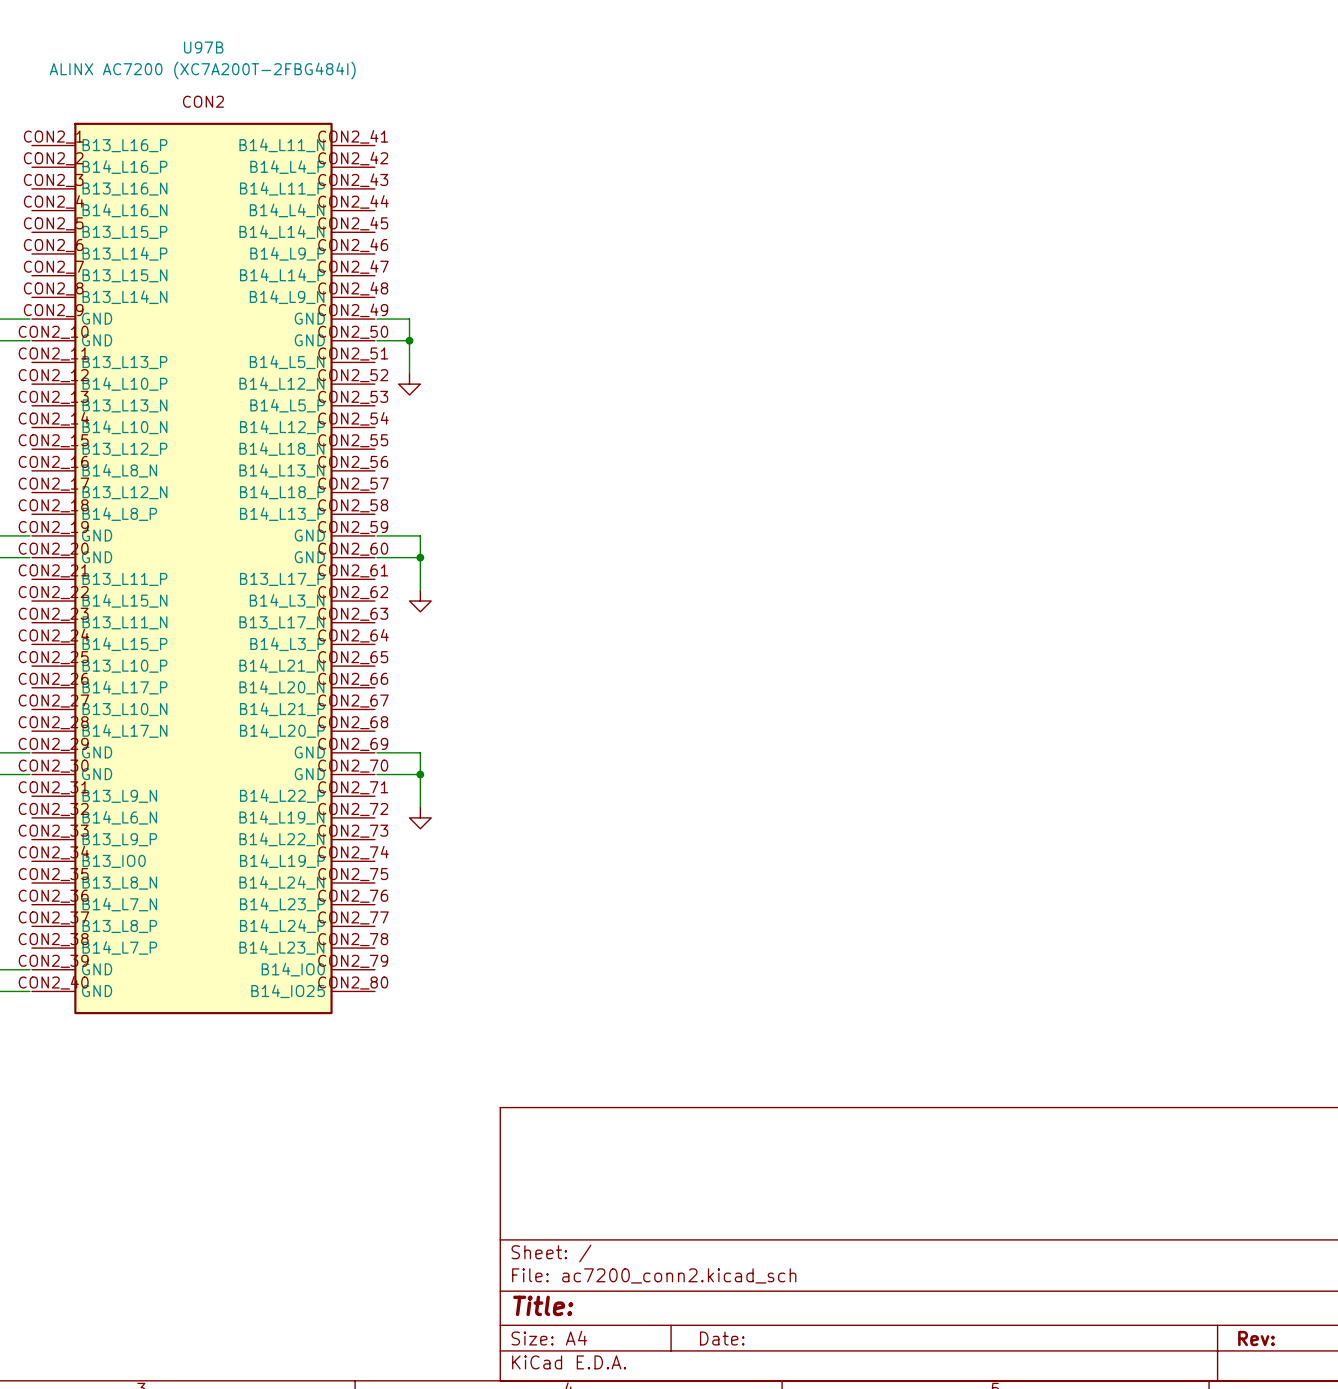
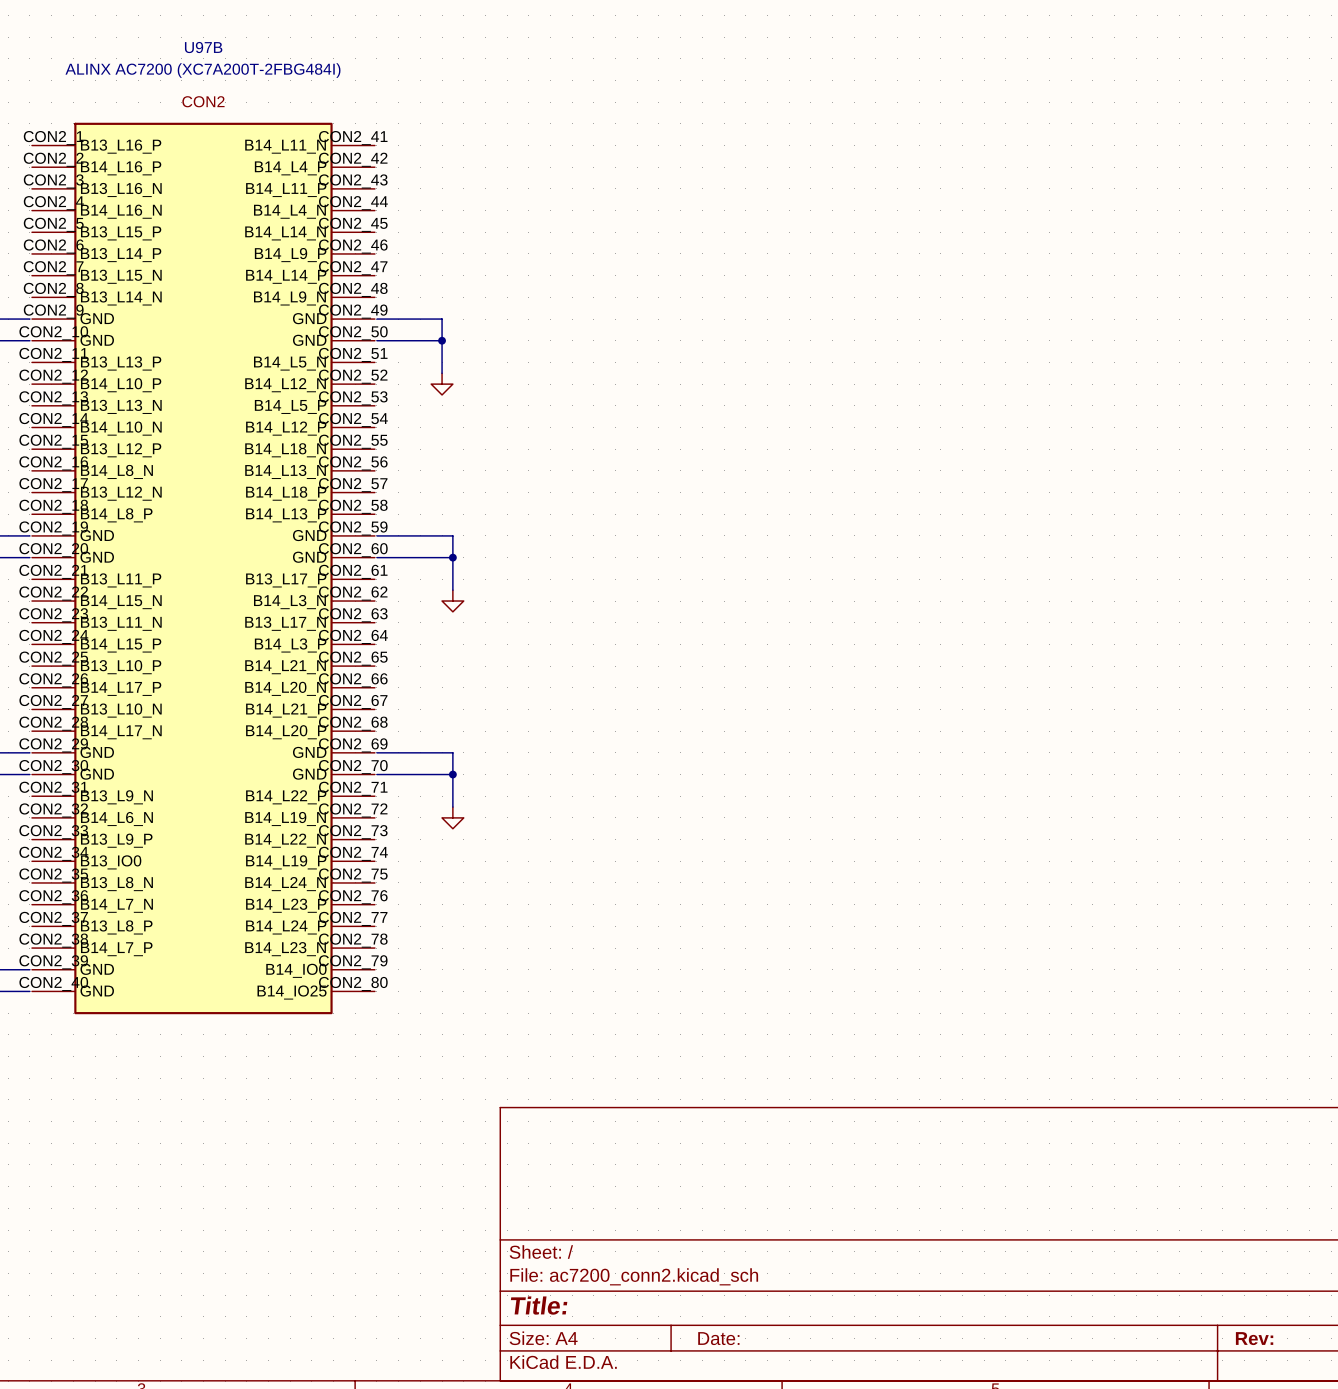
wire: (409, 319) (409, 373) -> (409, 319) (442, 319) (442, 373)
wire: none -> (409, 340) (442, 340)
junction position: (409, 340) -> (442, 340)
power symbol position: (409, 384) -> (442, 384)
wire: (420, 535) (420, 590) -> (420, 535) (452, 535) (452, 590)
wire: none -> (420, 557) (452, 557)
junction position: (420, 557) -> (452, 557)
power symbol position: (420, 601) -> (452, 601)
wire: (420, 752) (420, 807) -> (420, 752) (452, 752) (452, 807)
wire: none -> (420, 774) (452, 774)
junction position: (420, 774) -> (452, 774)
power symbol position: (420, 817) -> (452, 817)

